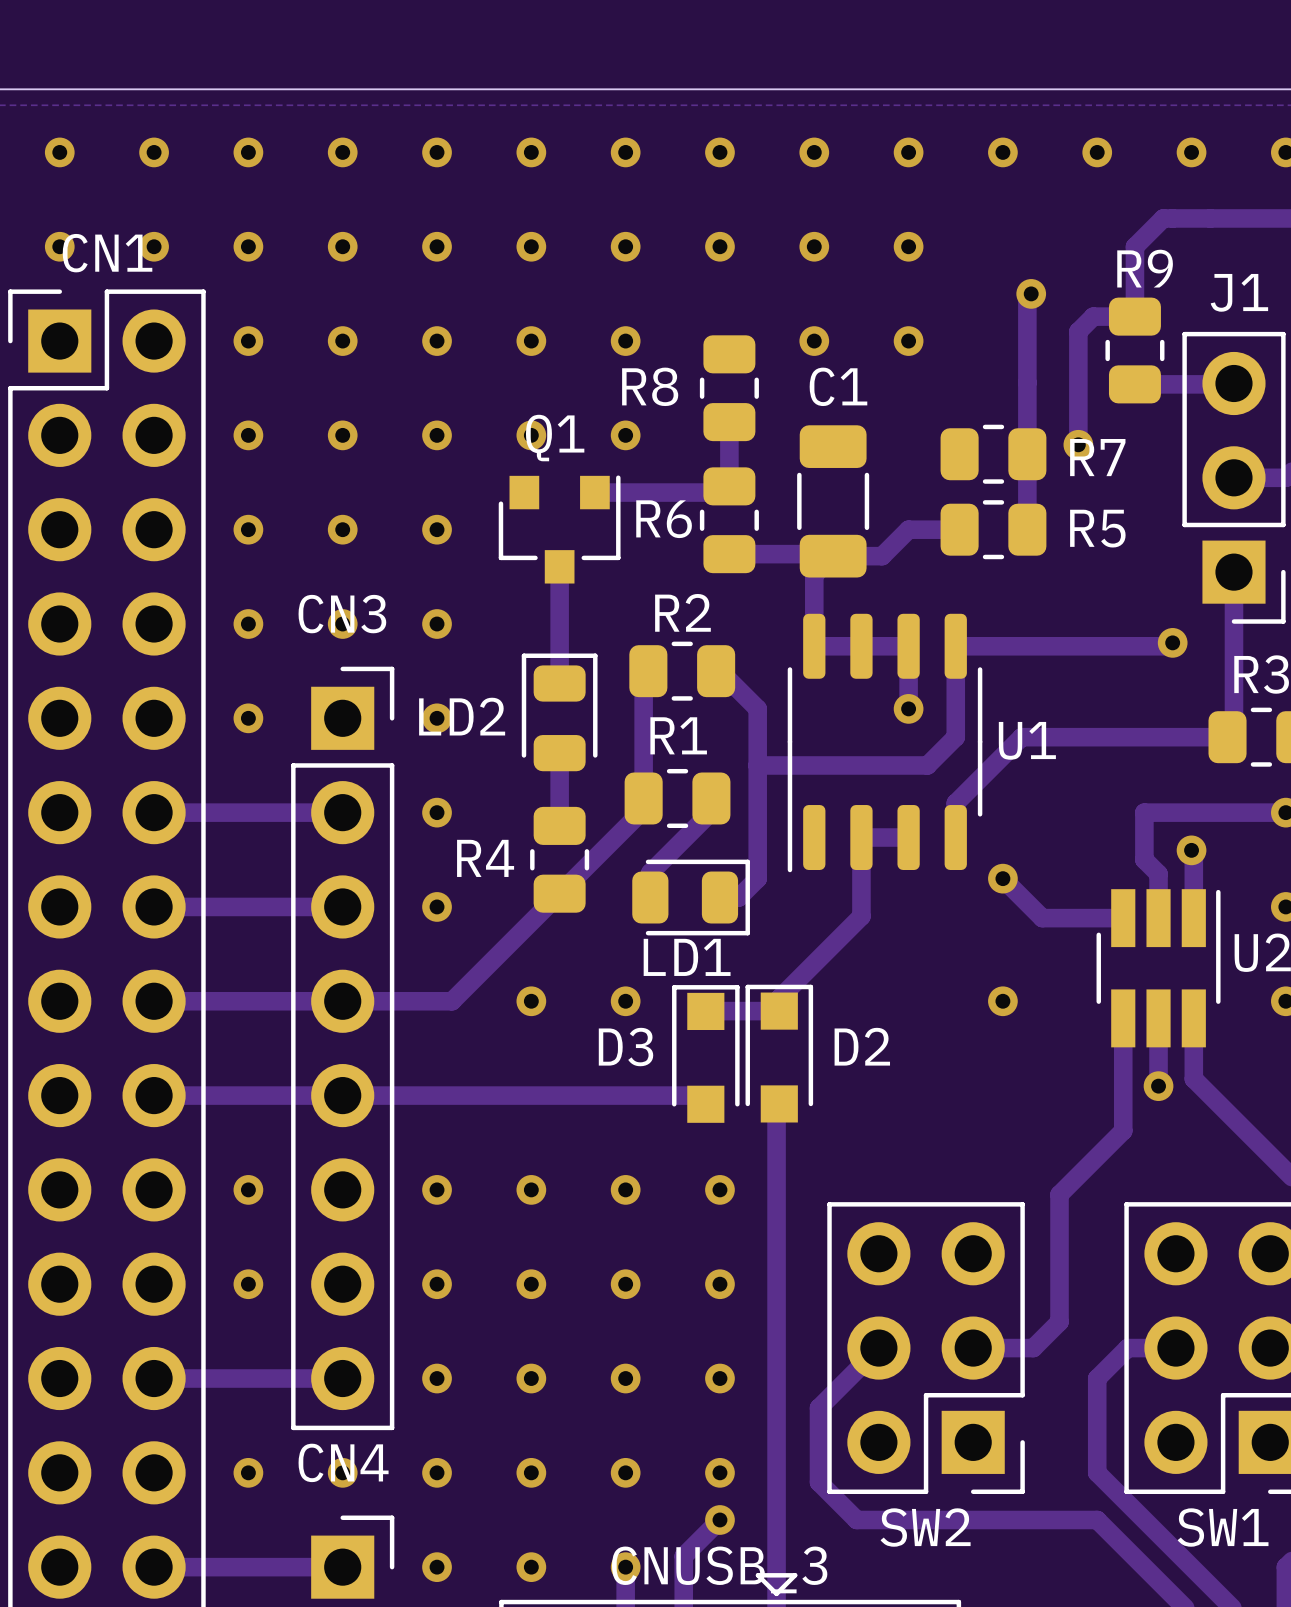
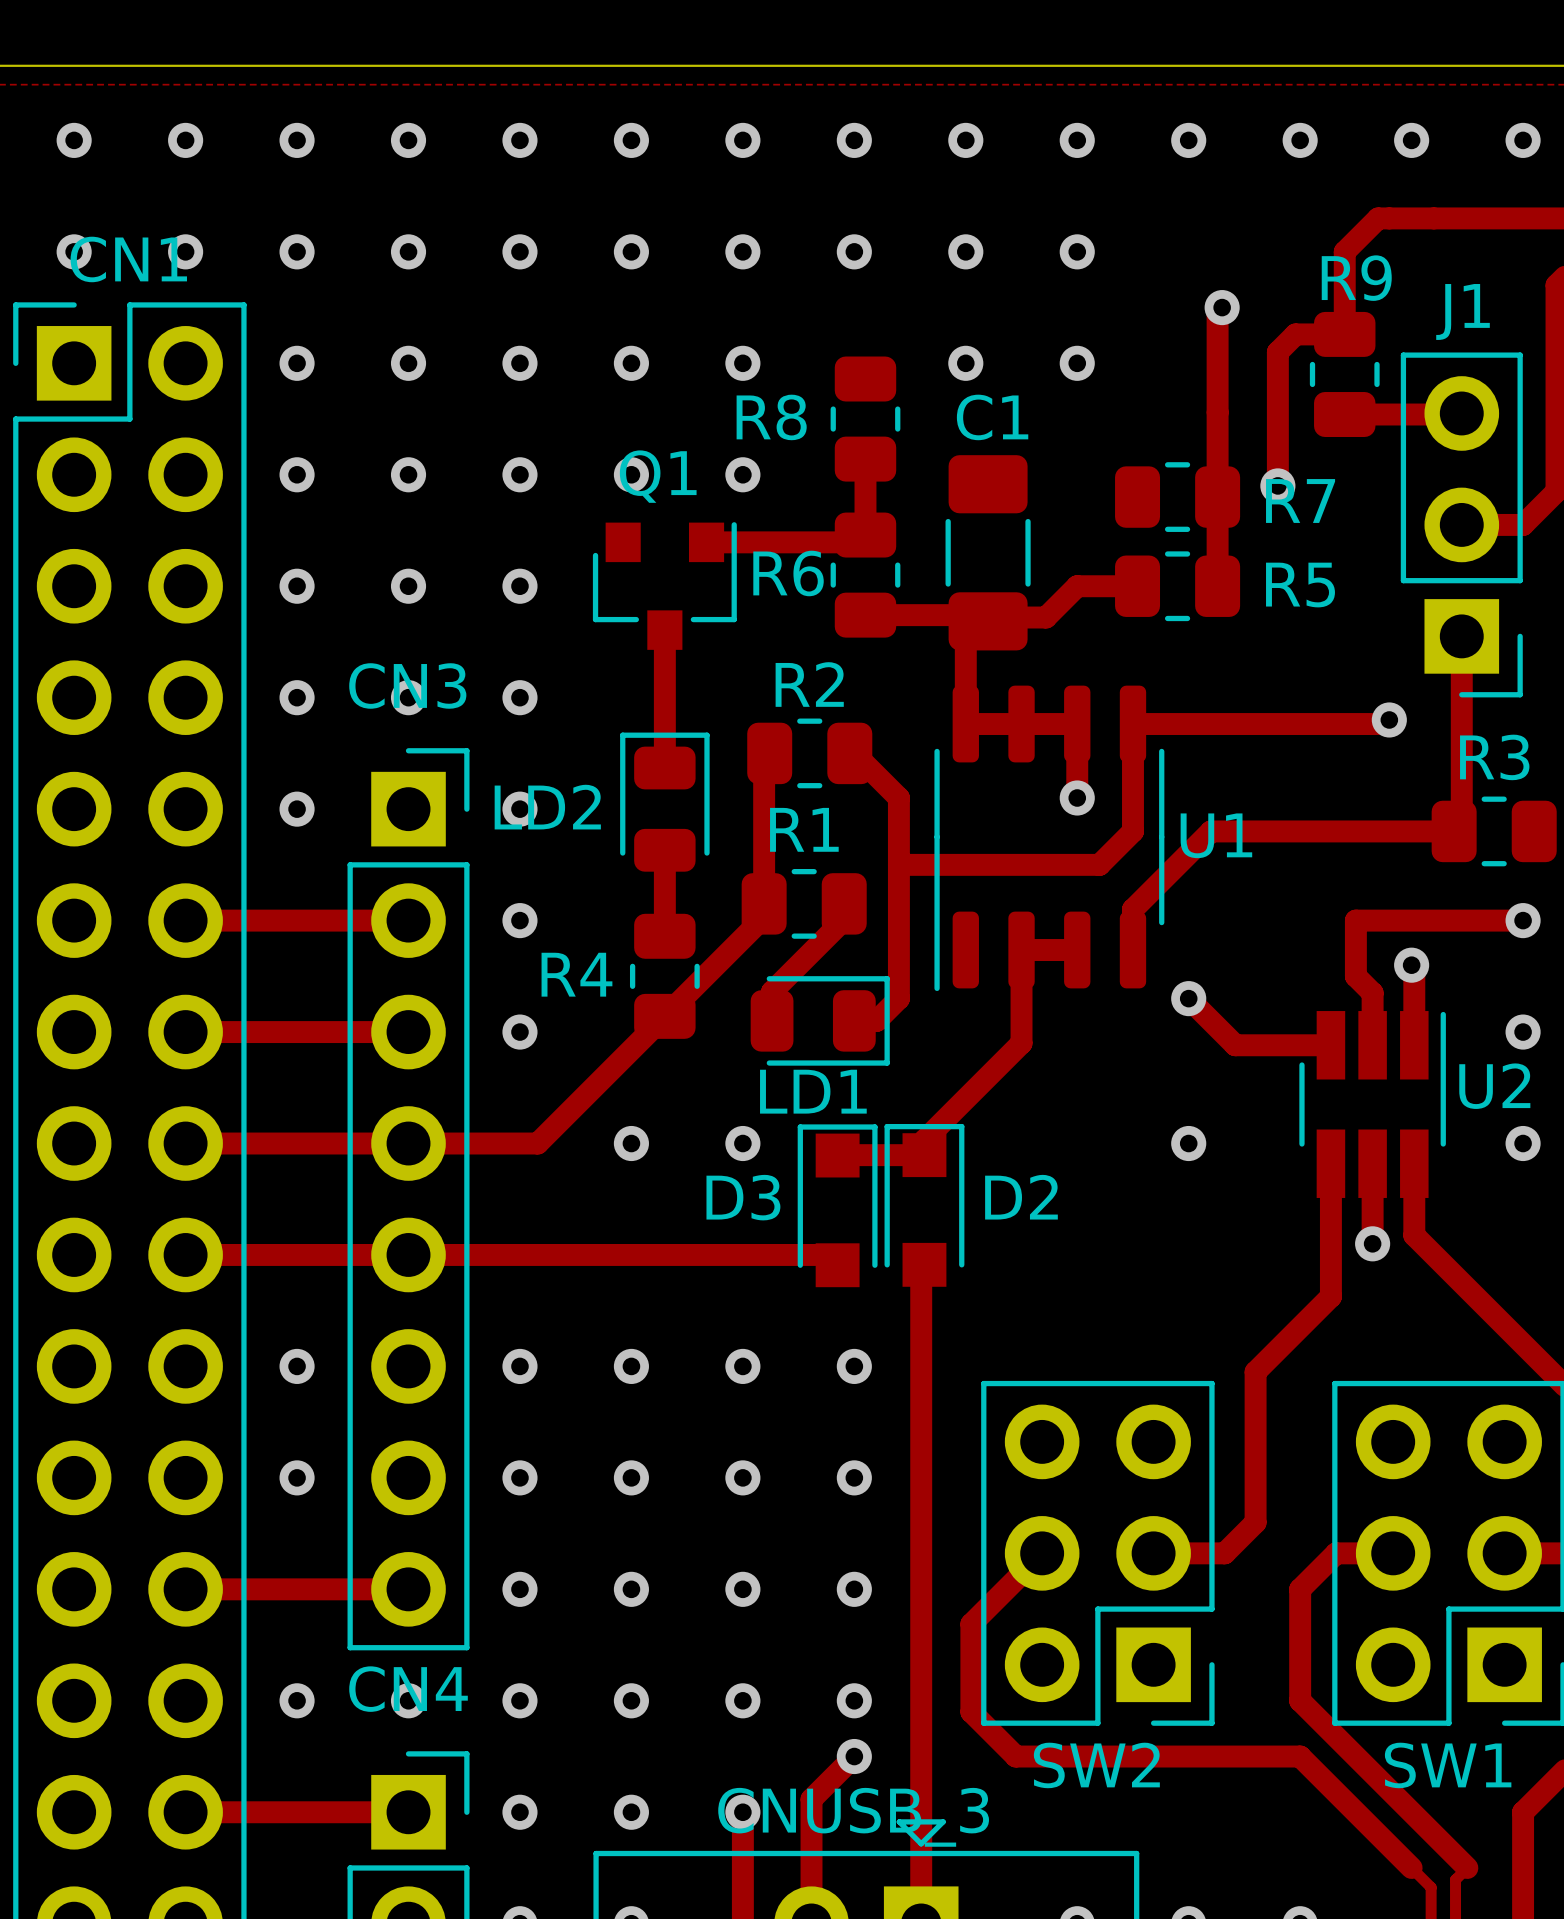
C1 footprint: [797, 425, 870, 578] -> [945, 455, 1031, 651]

